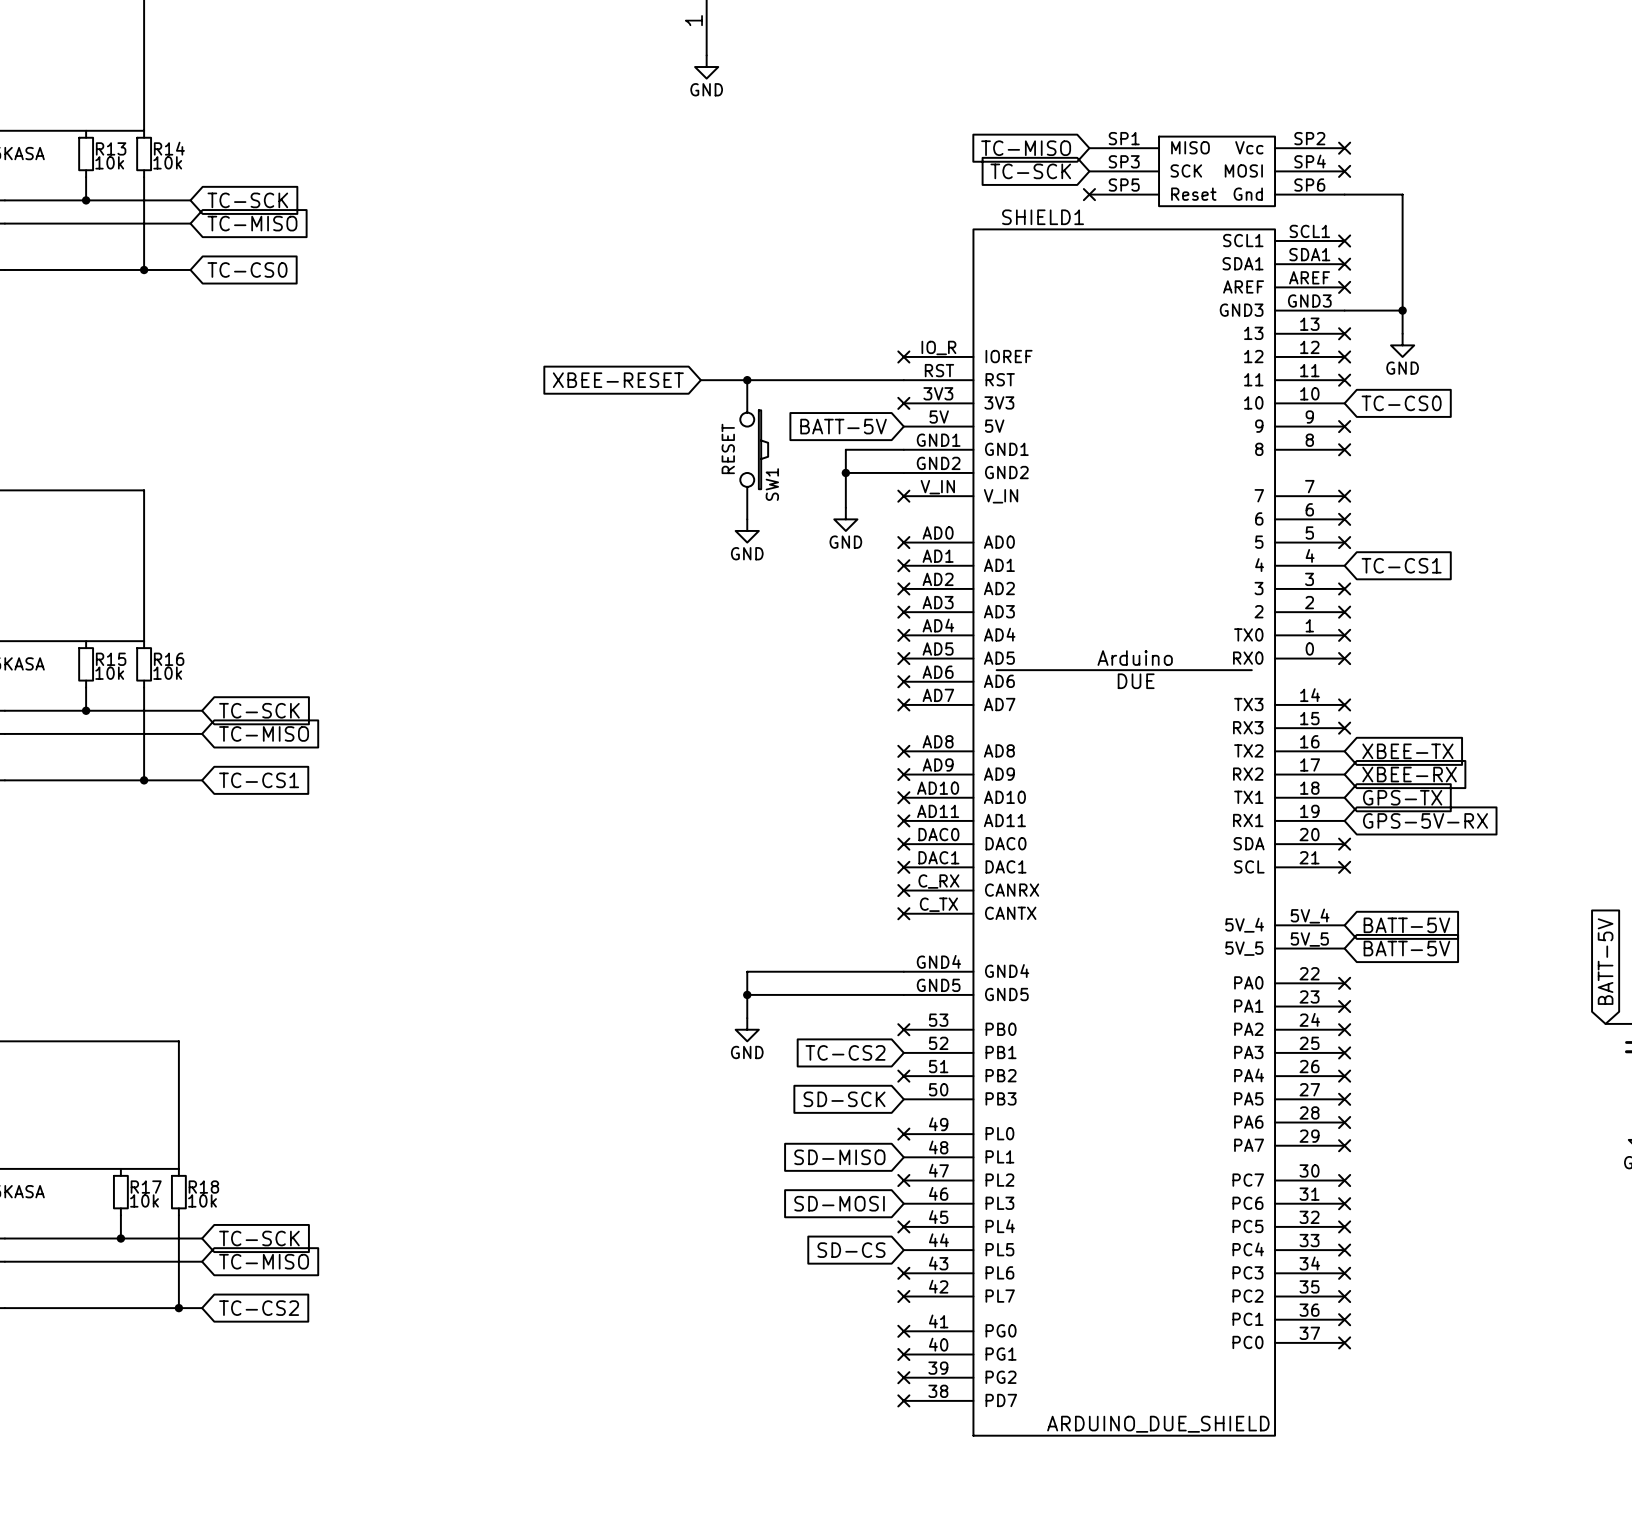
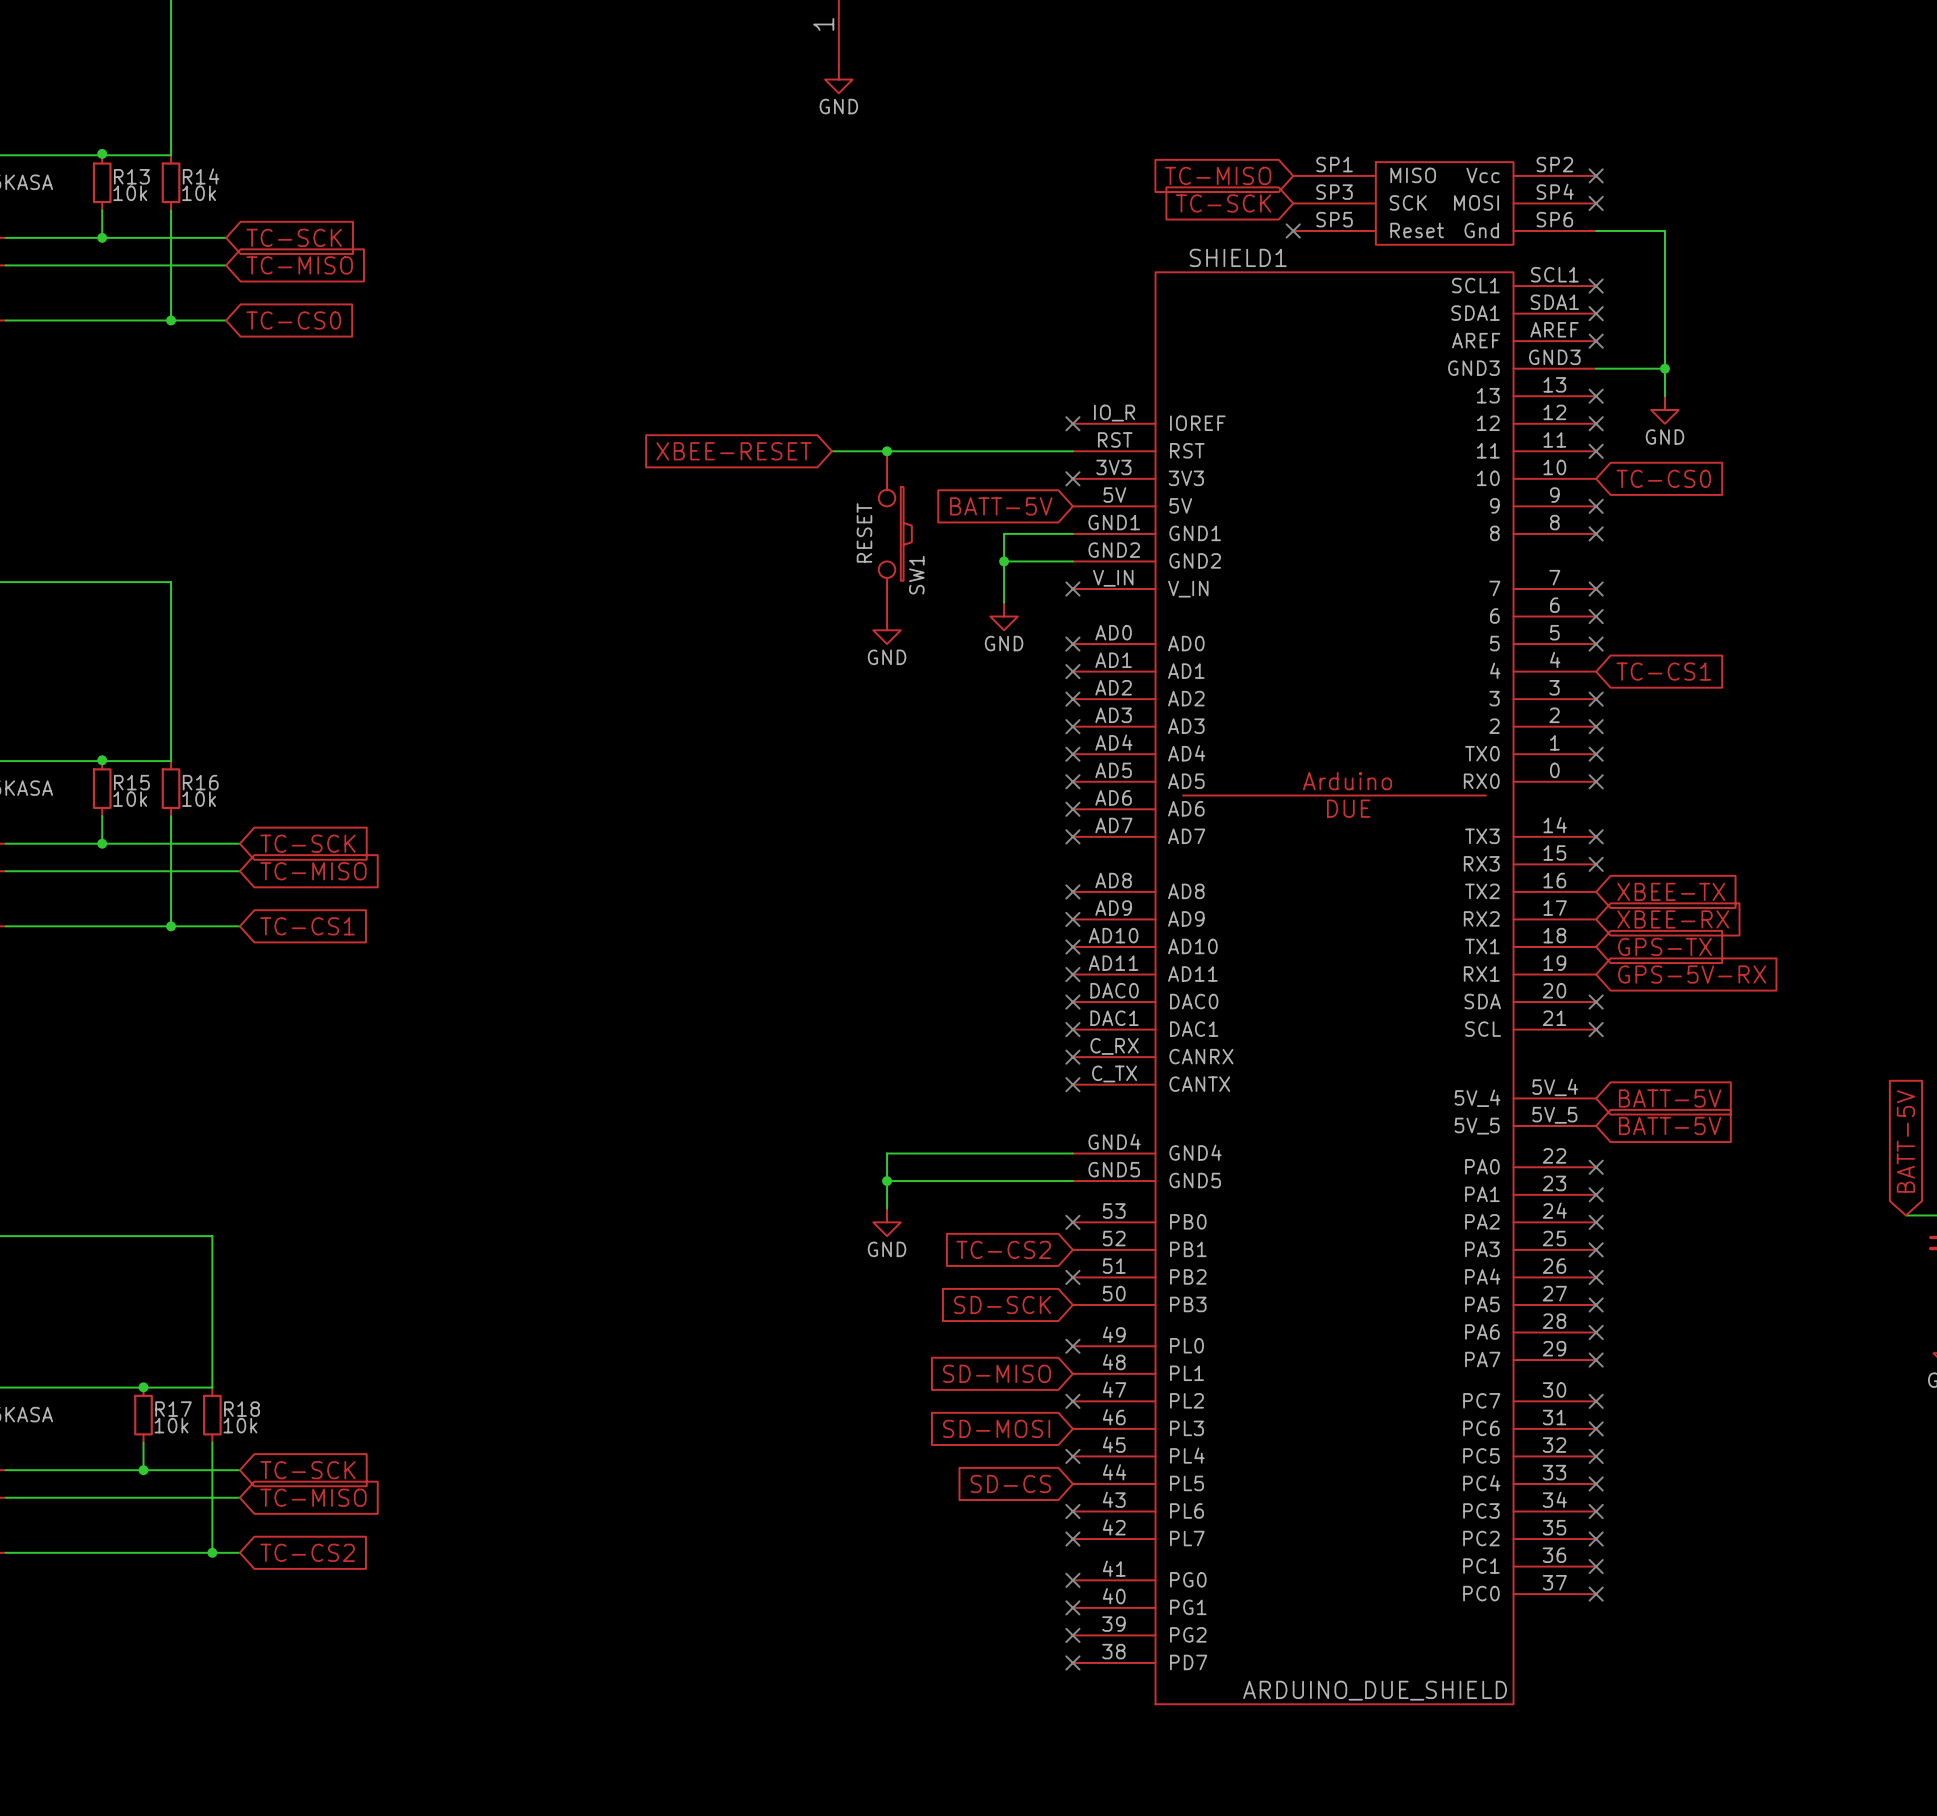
junction: none -> (102, 153)
junction: none -> (102, 760)
junction: none -> (143, 1387)

